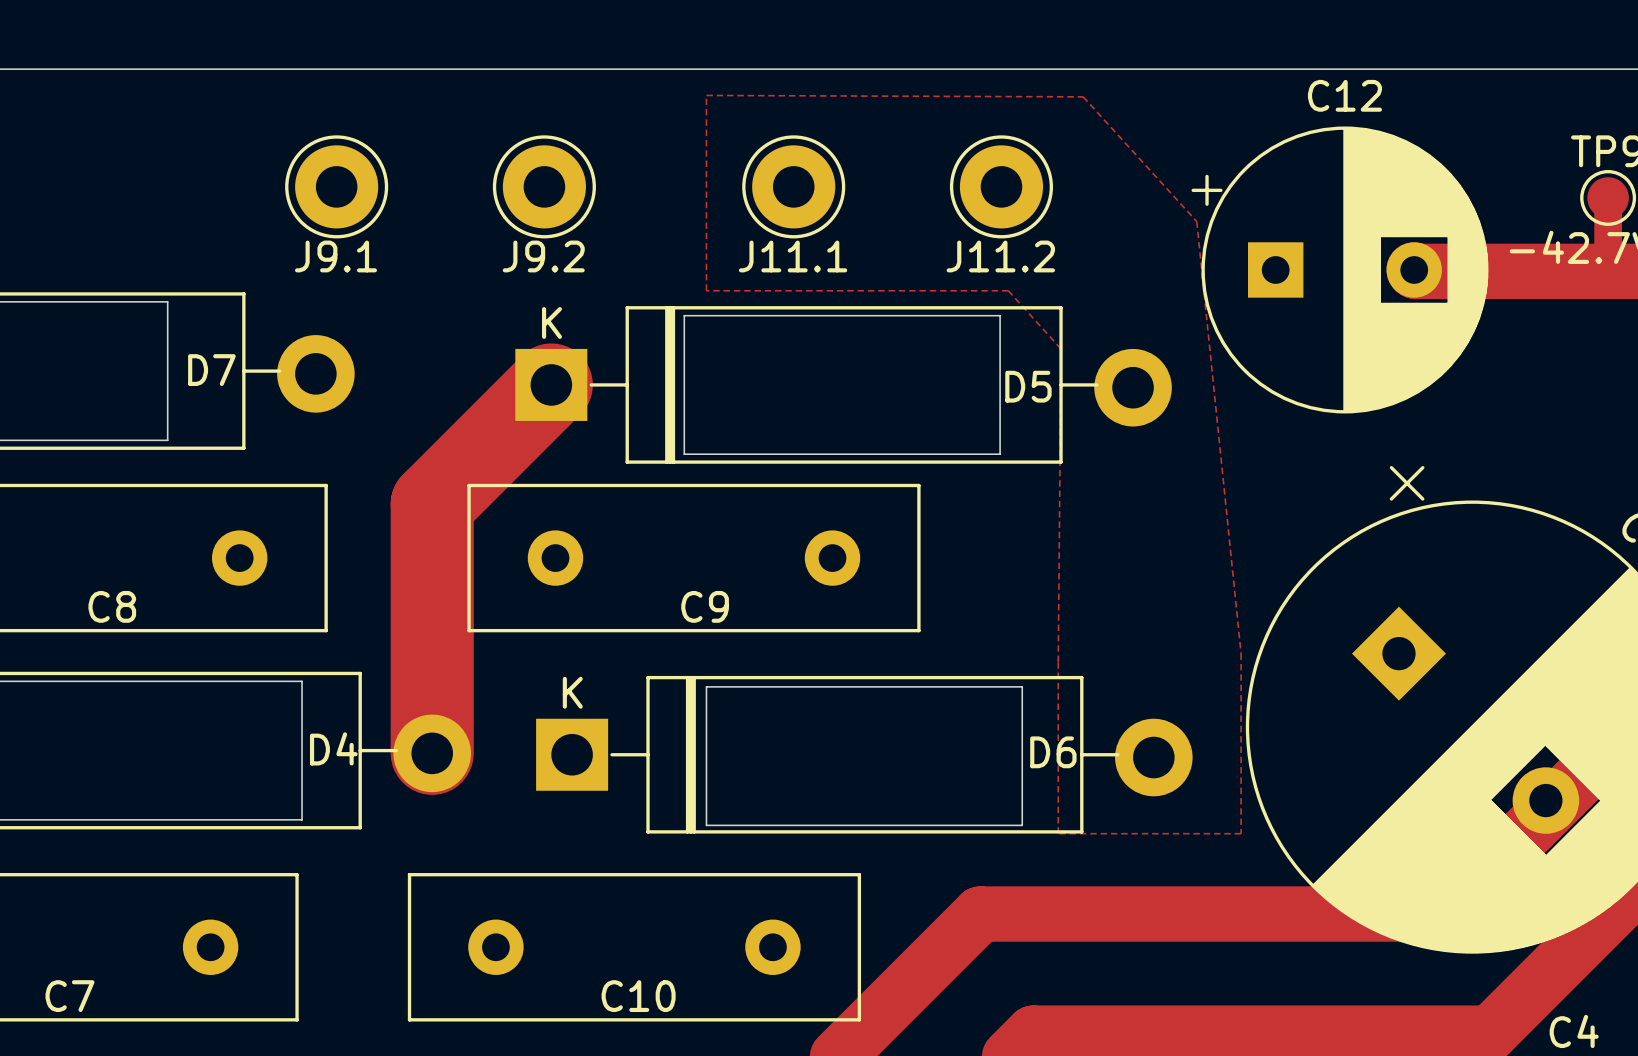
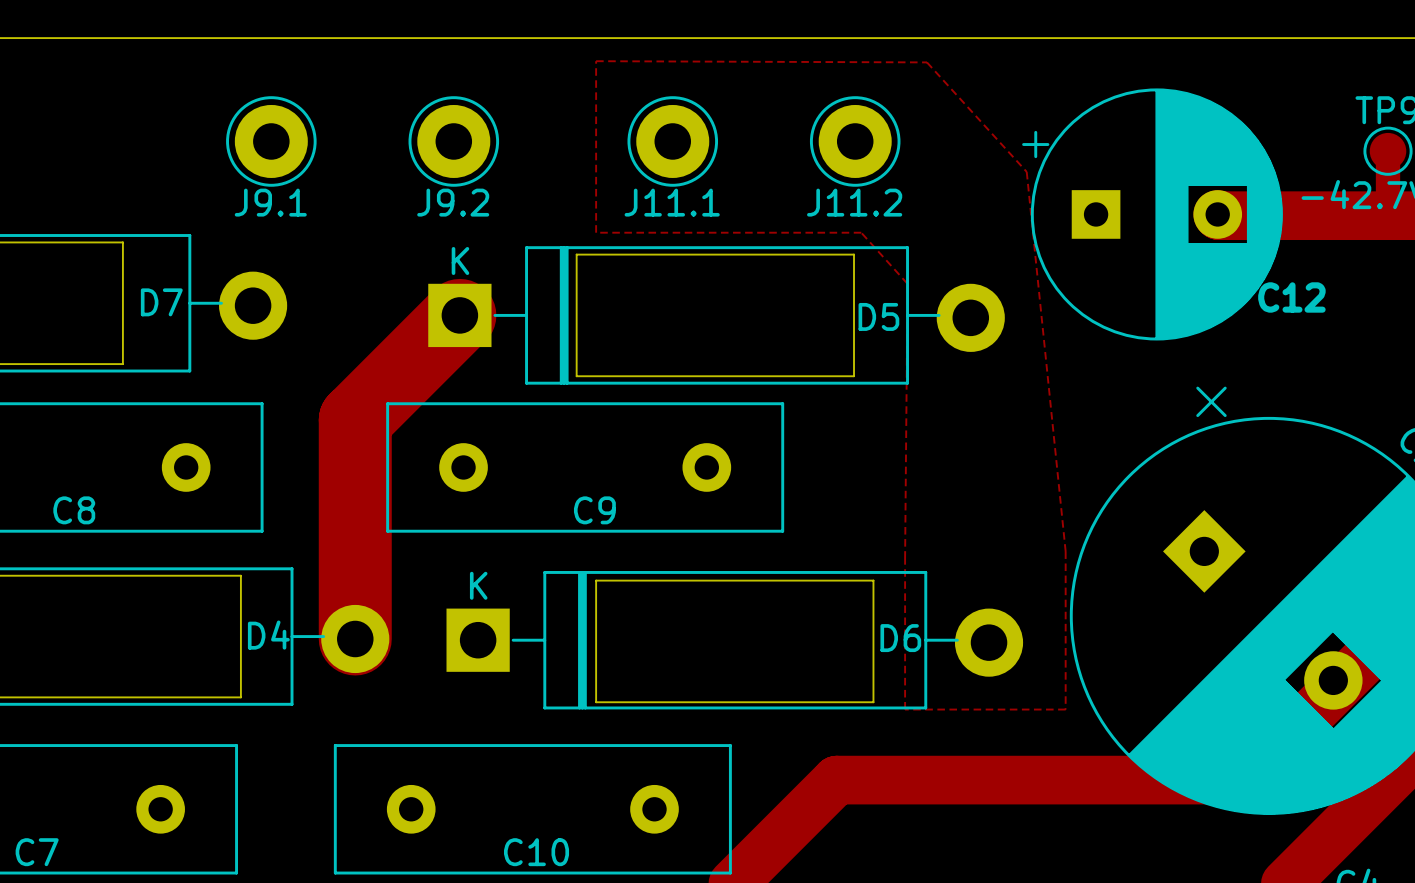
C12 name position: C12 (1344, 95) -> C12 (1291, 297)

